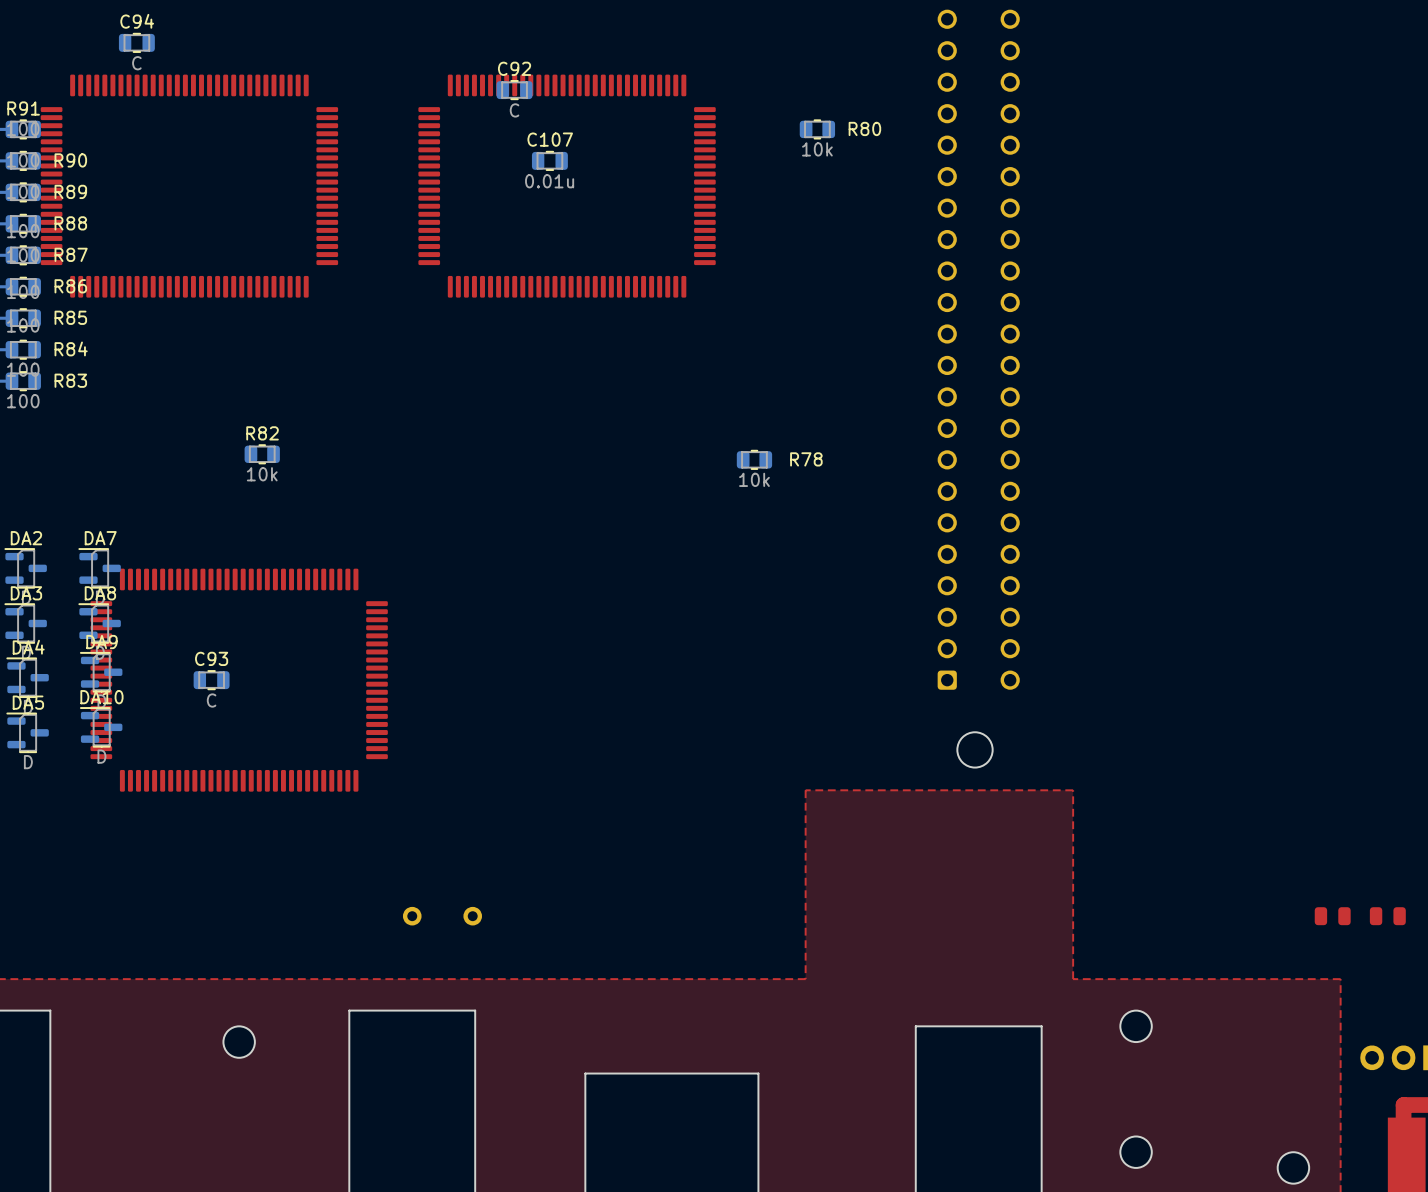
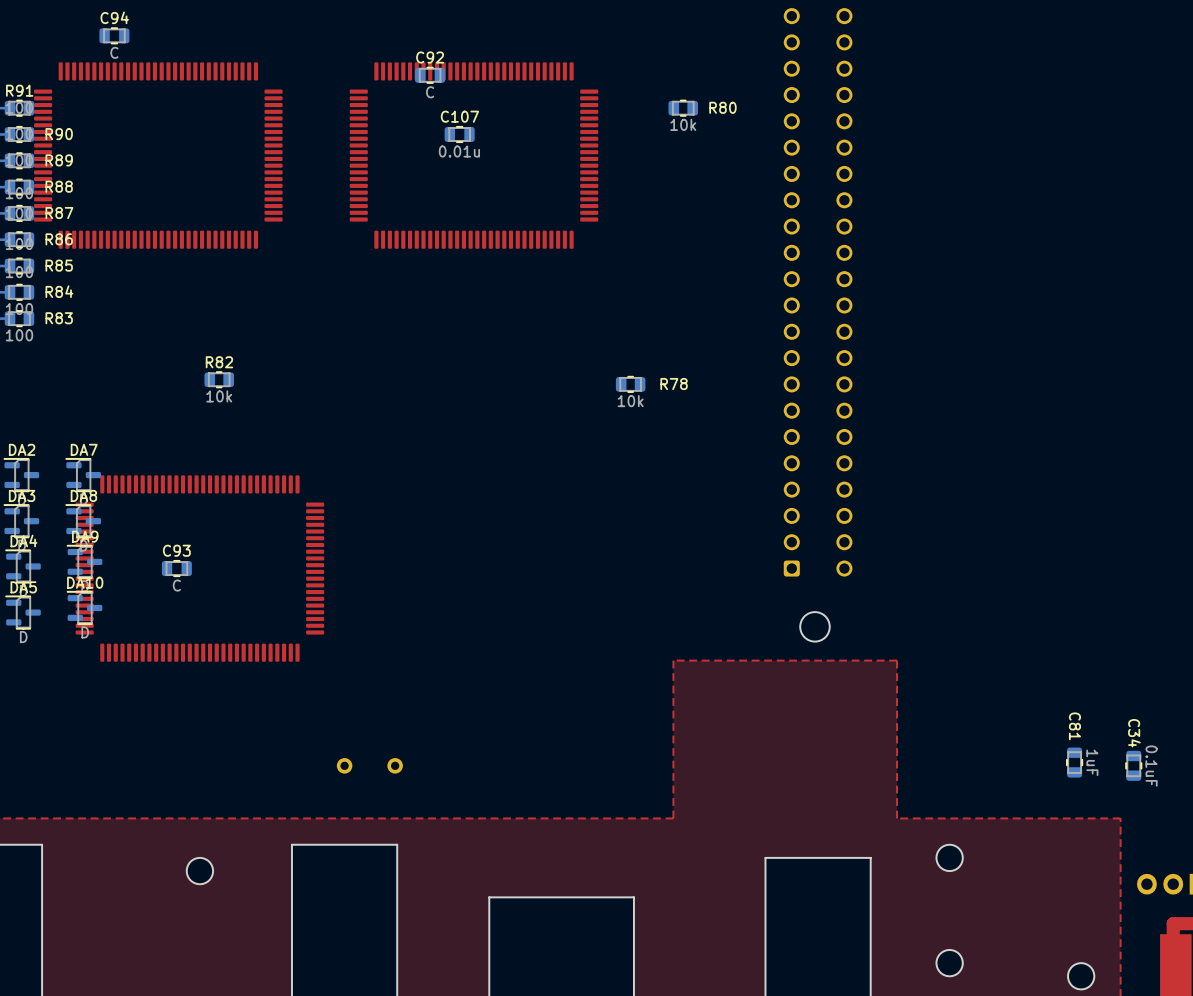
C81 side: top (1332, 916) -> bottom (1074, 762)
C34 side: top (1387, 916) -> bottom (1133, 765)

